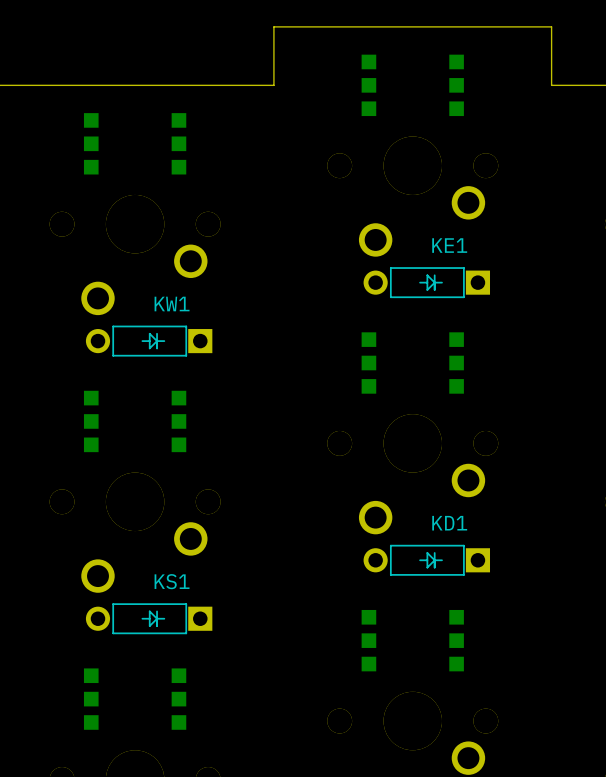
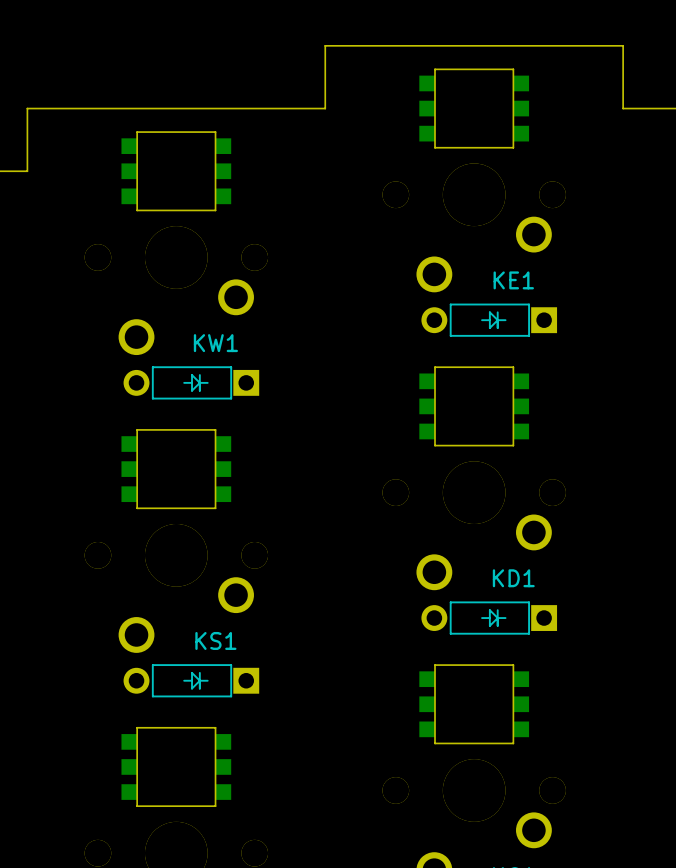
board edge: none -> (435, 69) (435, 147) (513, 147) (513, 69) (435, 69)
board edge: none -> (137, 132) (137, 210) (215, 210) (215, 132) (137, 132)
board edge: none -> (435, 367) (435, 445) (513, 445) (513, 367) (435, 367)
board edge: none -> (137, 429) (137, 508) (215, 508) (215, 429) (137, 429)
board edge: none -> (435, 665) (513, 665) (513, 743) (435, 743) (435, 665)
board edge: none -> (137, 727) (215, 727) (215, 806) (137, 806) (137, 727)

